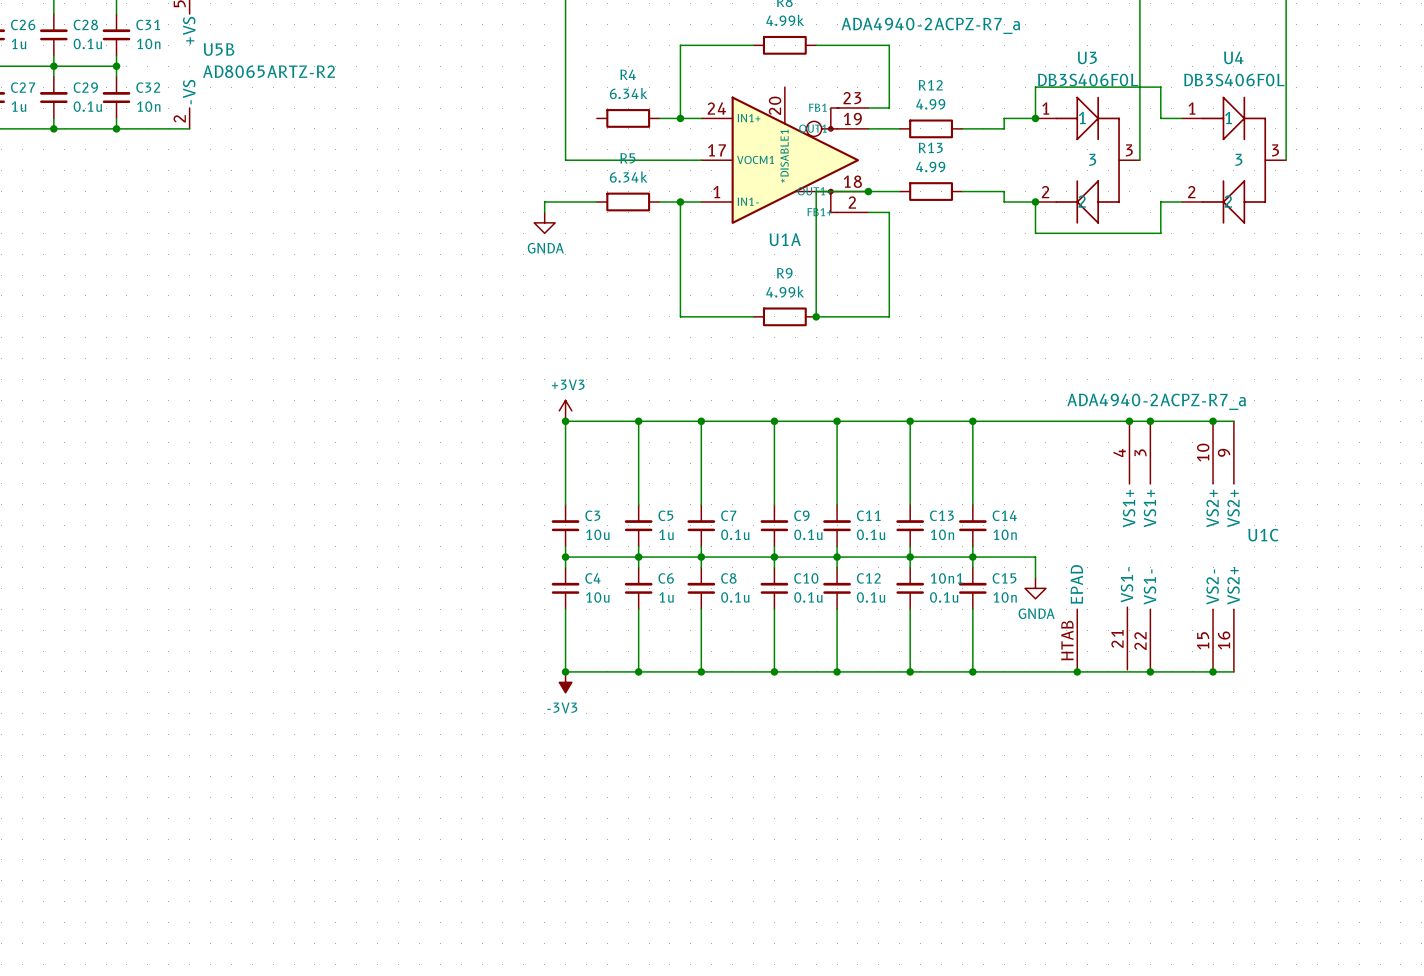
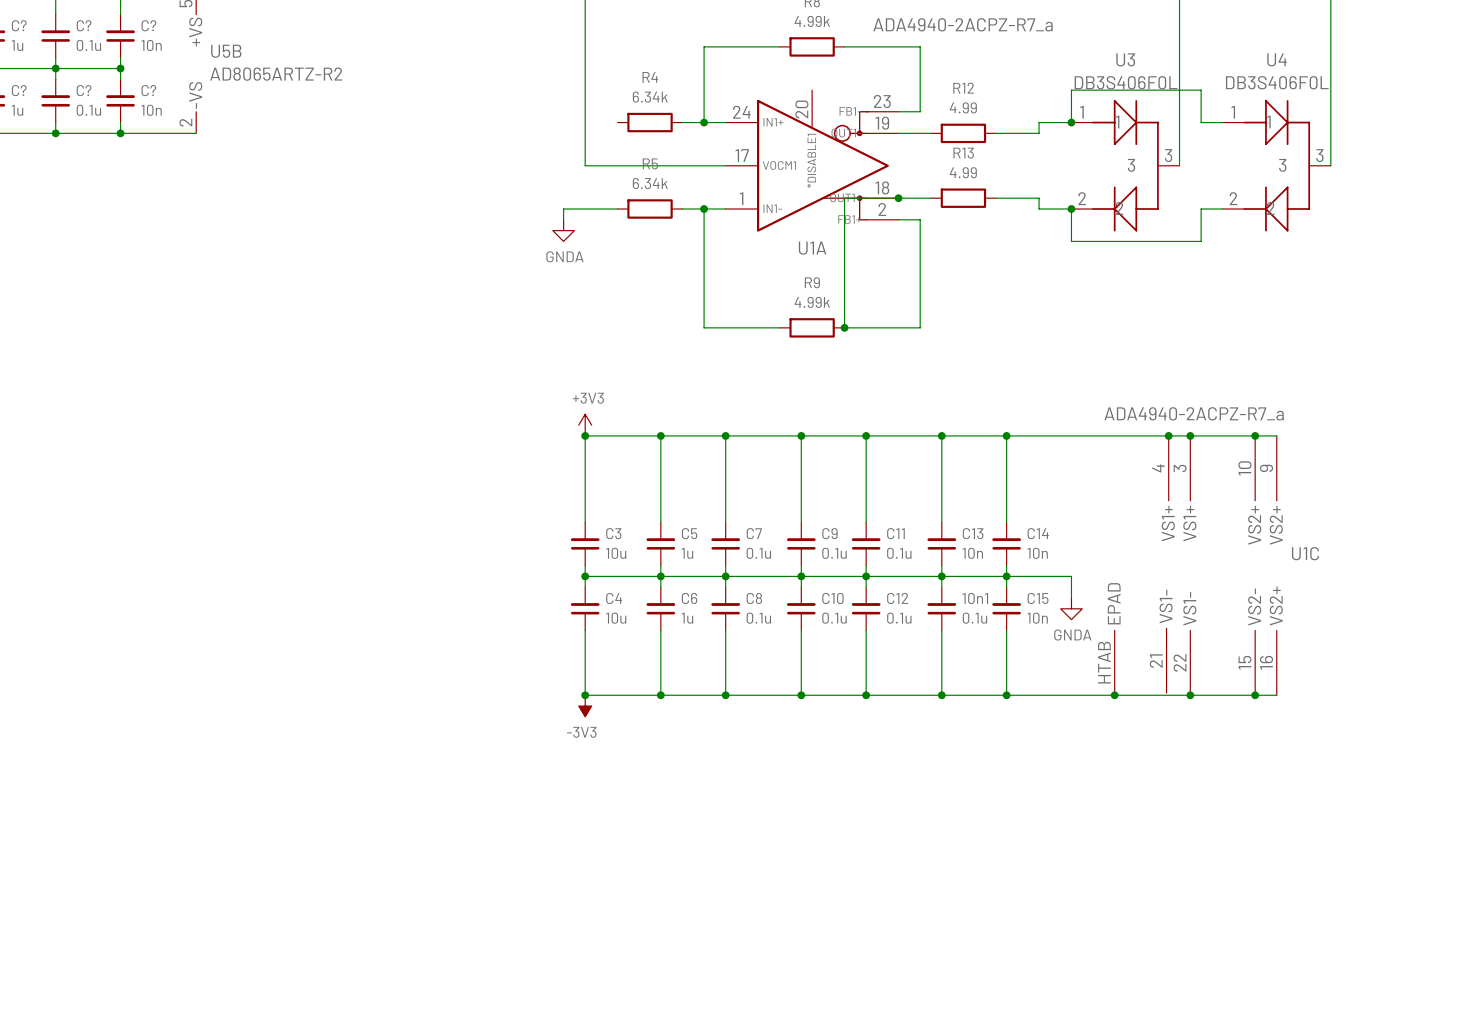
C26 name: C26 (23, 24) -> C? (19, 25)
C28 name: C28 (85, 24) -> C? (84, 25)
C31 name: C31 (148, 24) -> C? (148, 25)
C27 name: C27 (23, 87) -> C? (19, 90)
C29 name: C29 (85, 87) -> C? (84, 90)
C32 name: C32 (148, 87) -> C? (148, 90)

